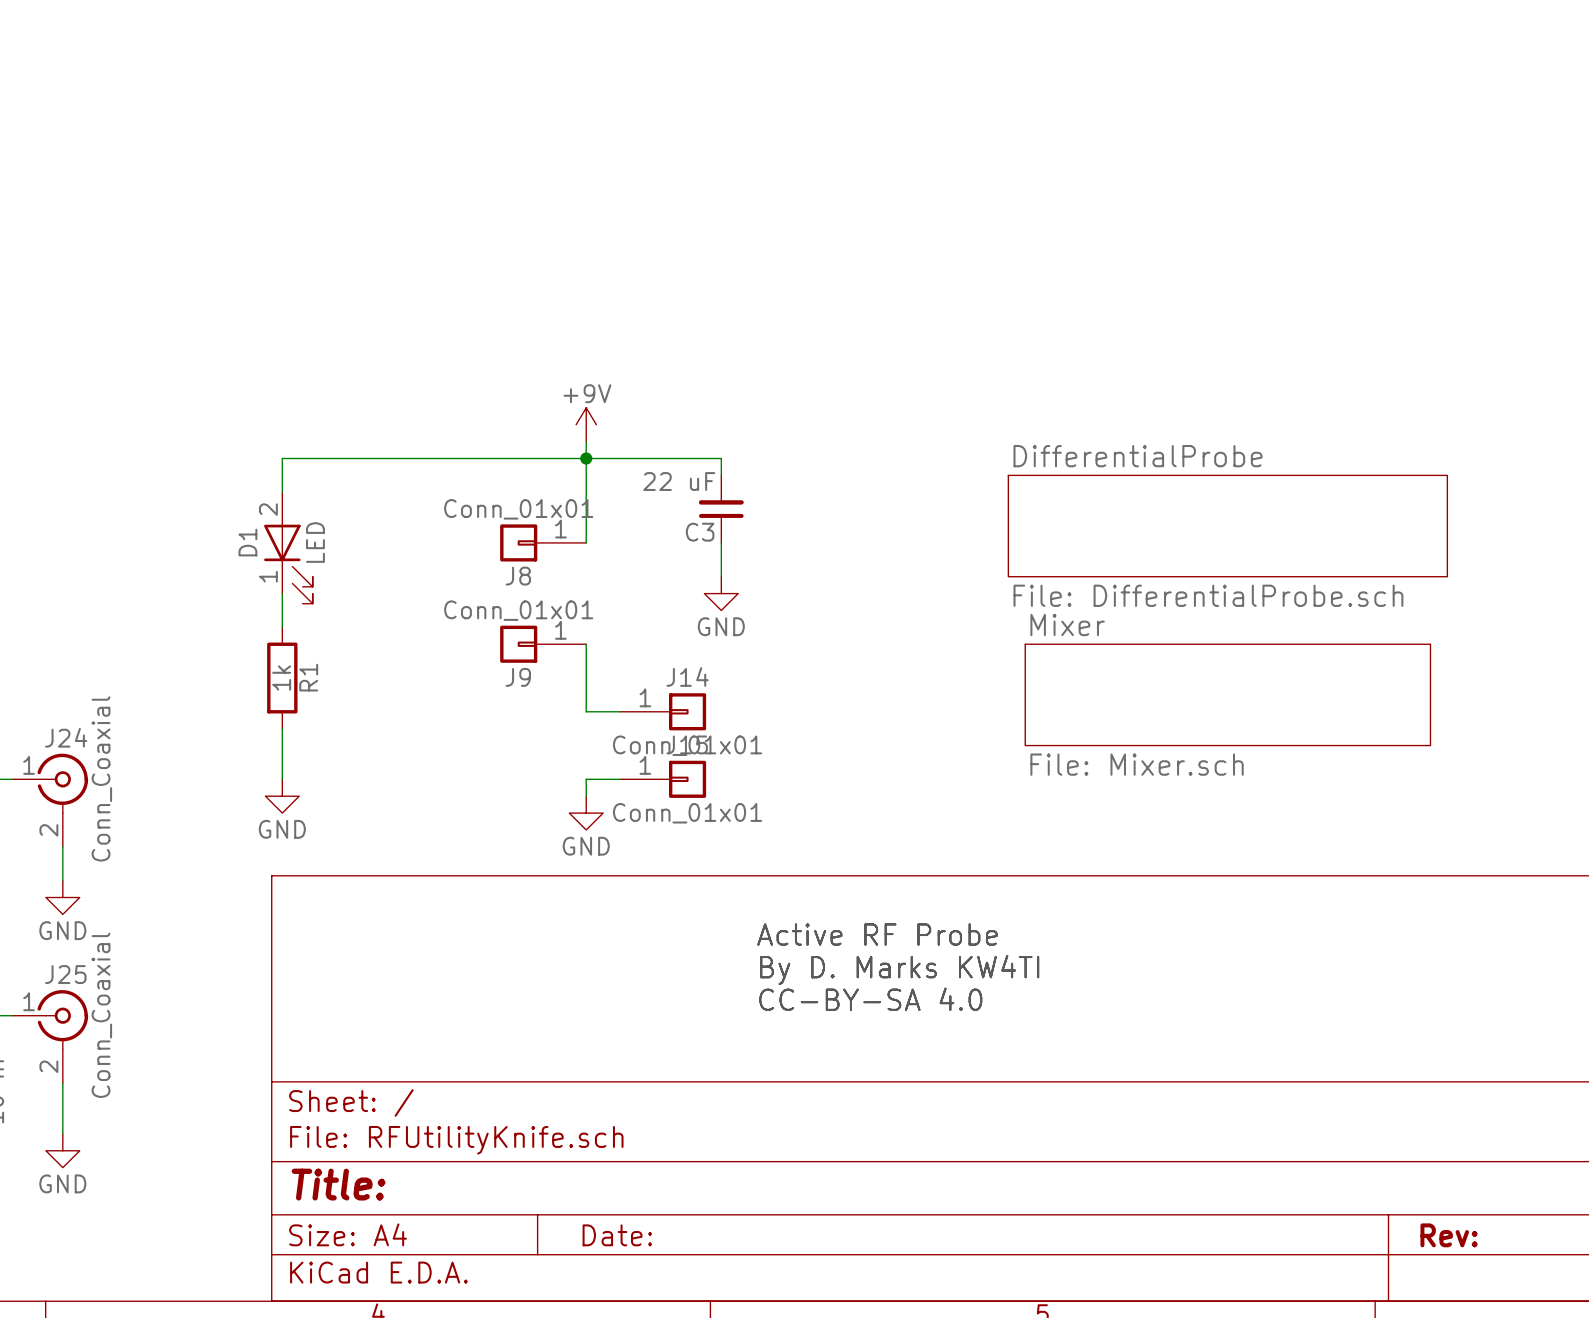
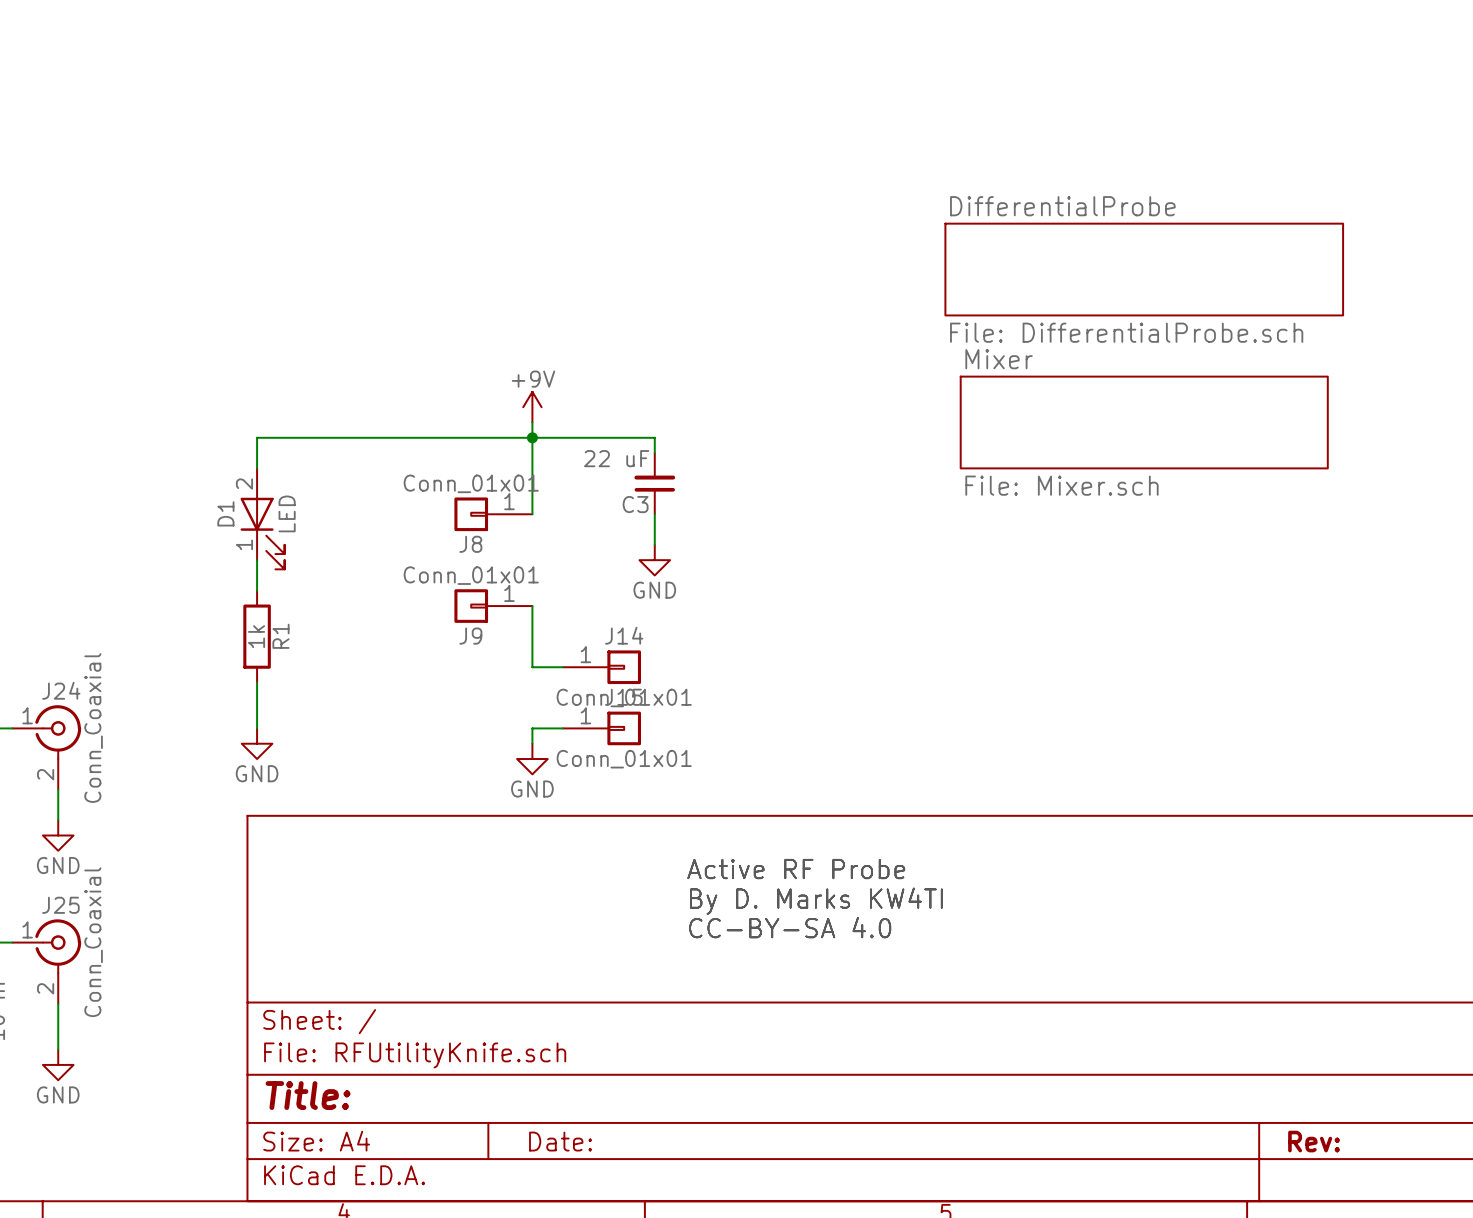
sheet DifferentialProbe position: (1227, 526) -> (1144, 269)
sheet Mixer position: (1227, 694) -> (1144, 422)

